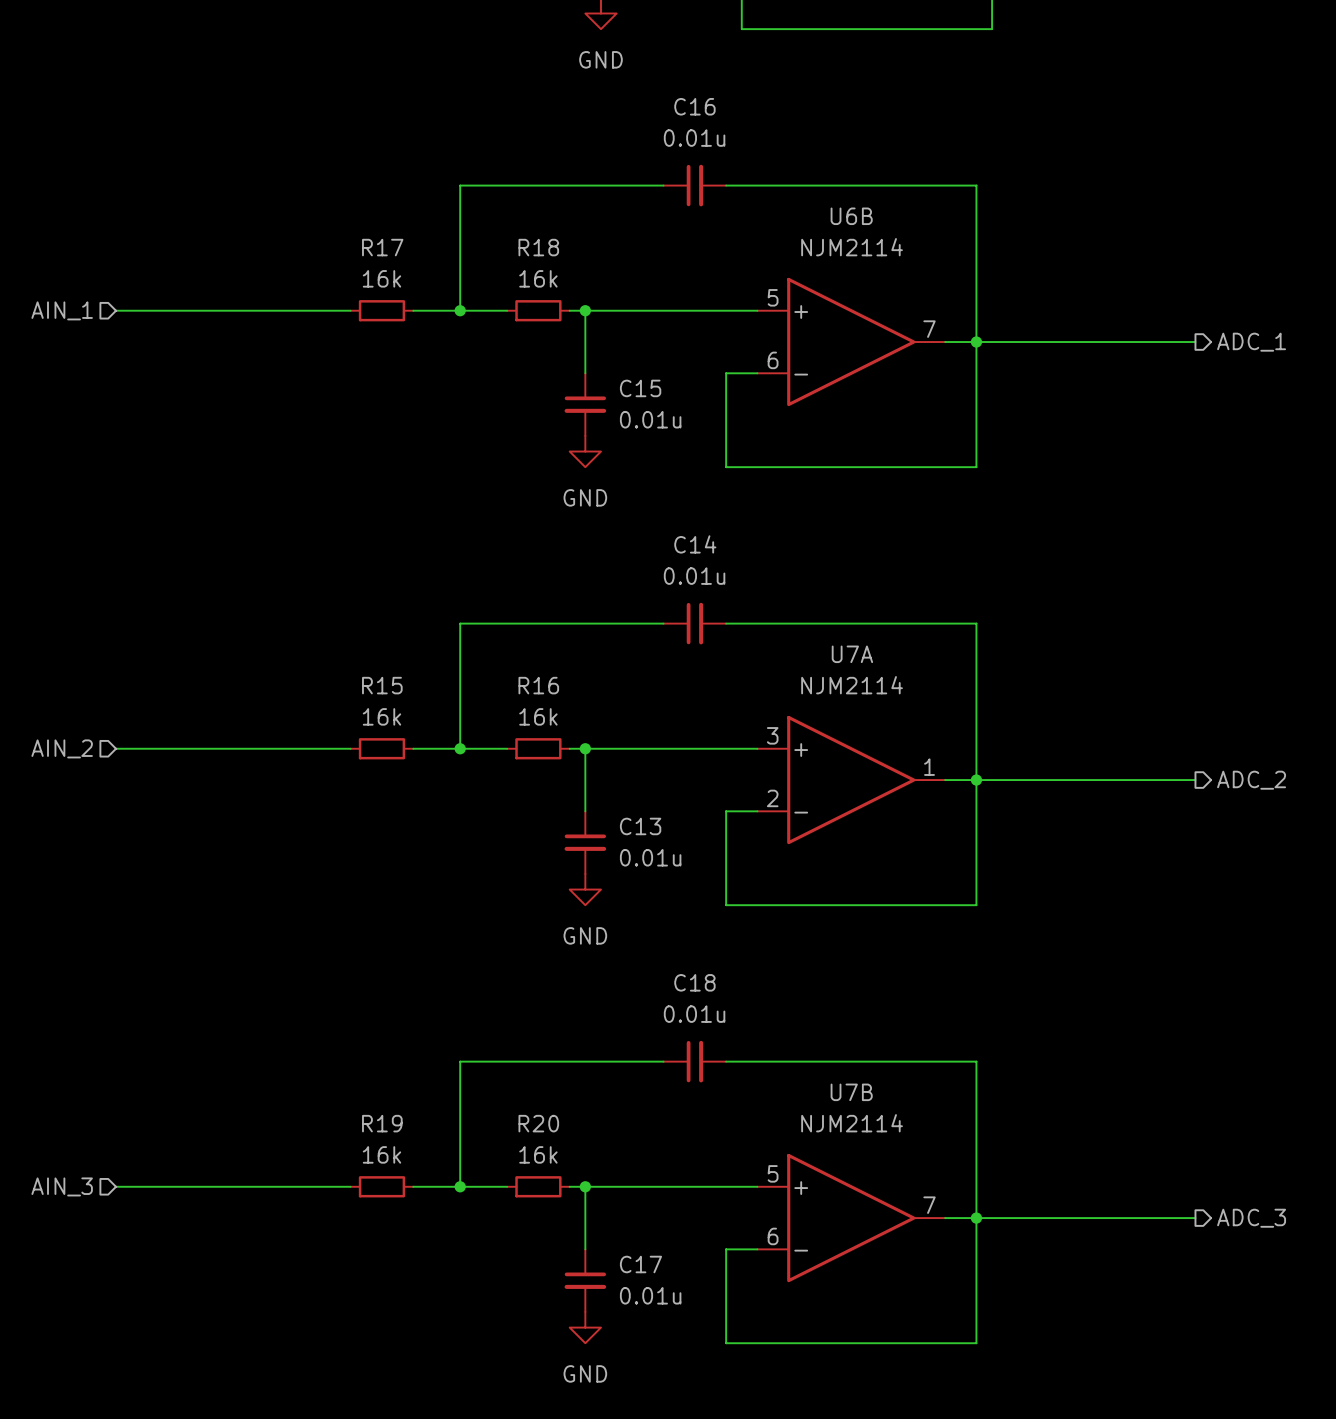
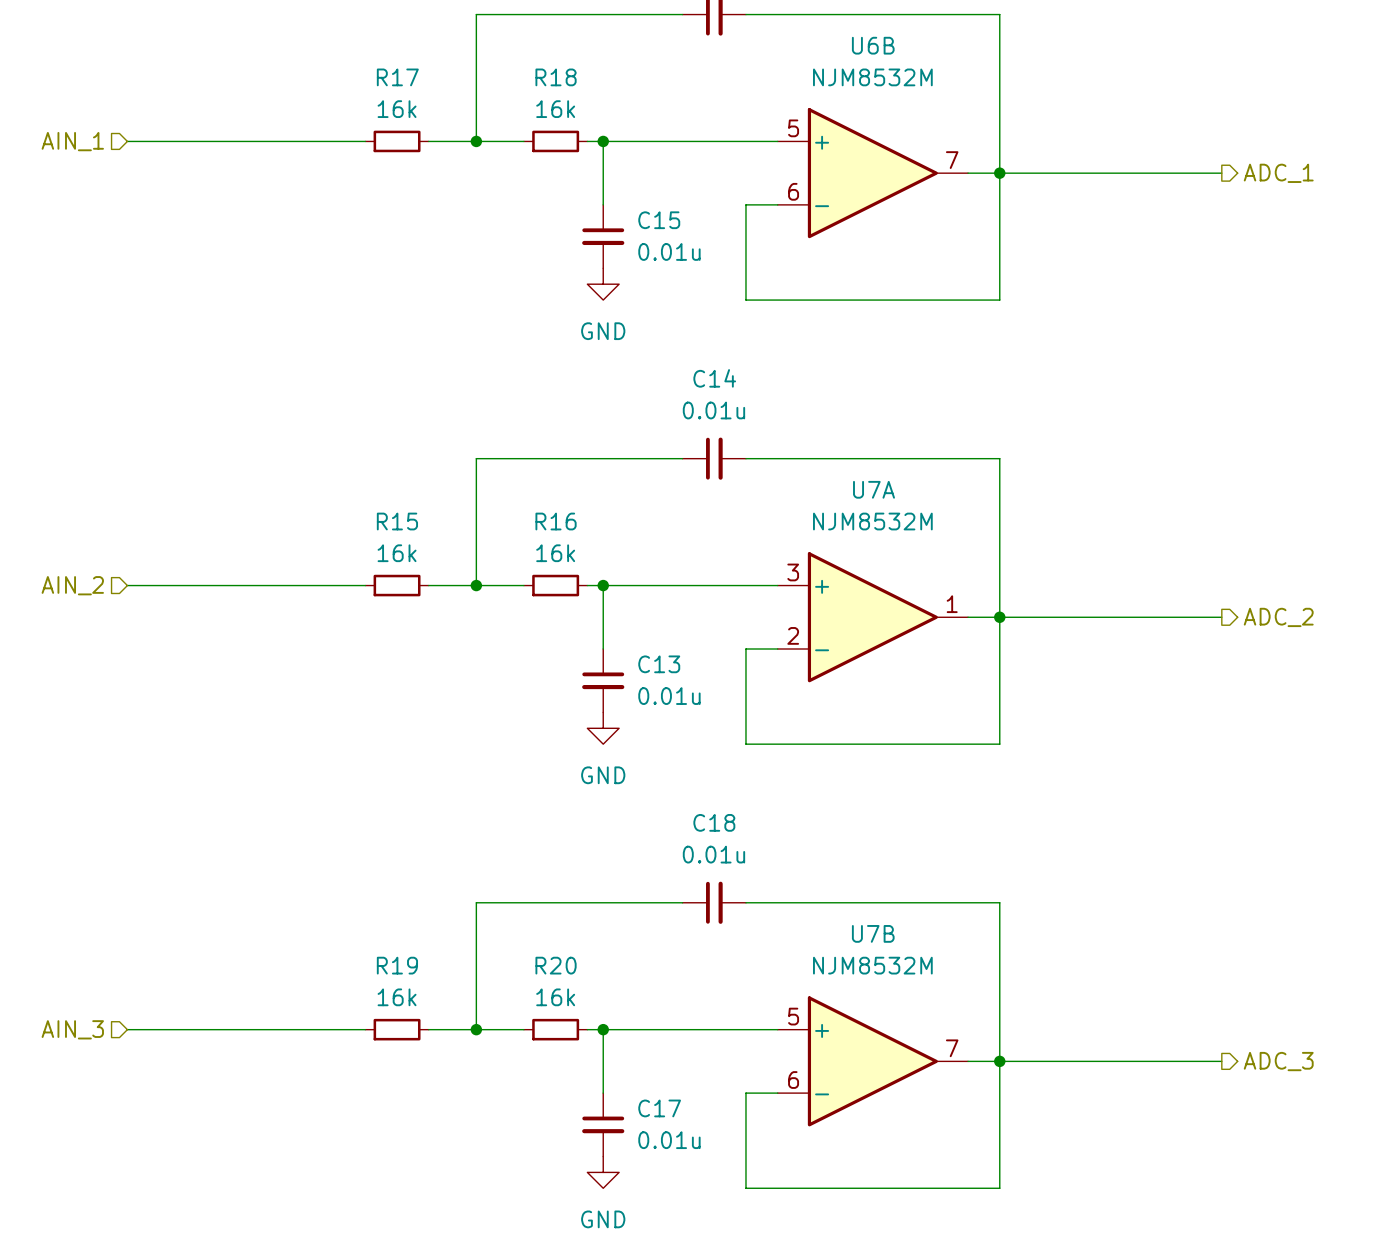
U6B value: NJM2114 (852, 247) -> NJM8532M (872, 77)
U7A value: NJM2114 (852, 685) -> NJM8532M (872, 521)
U7B value: NJM2114 (852, 1123) -> NJM8532M (872, 965)

